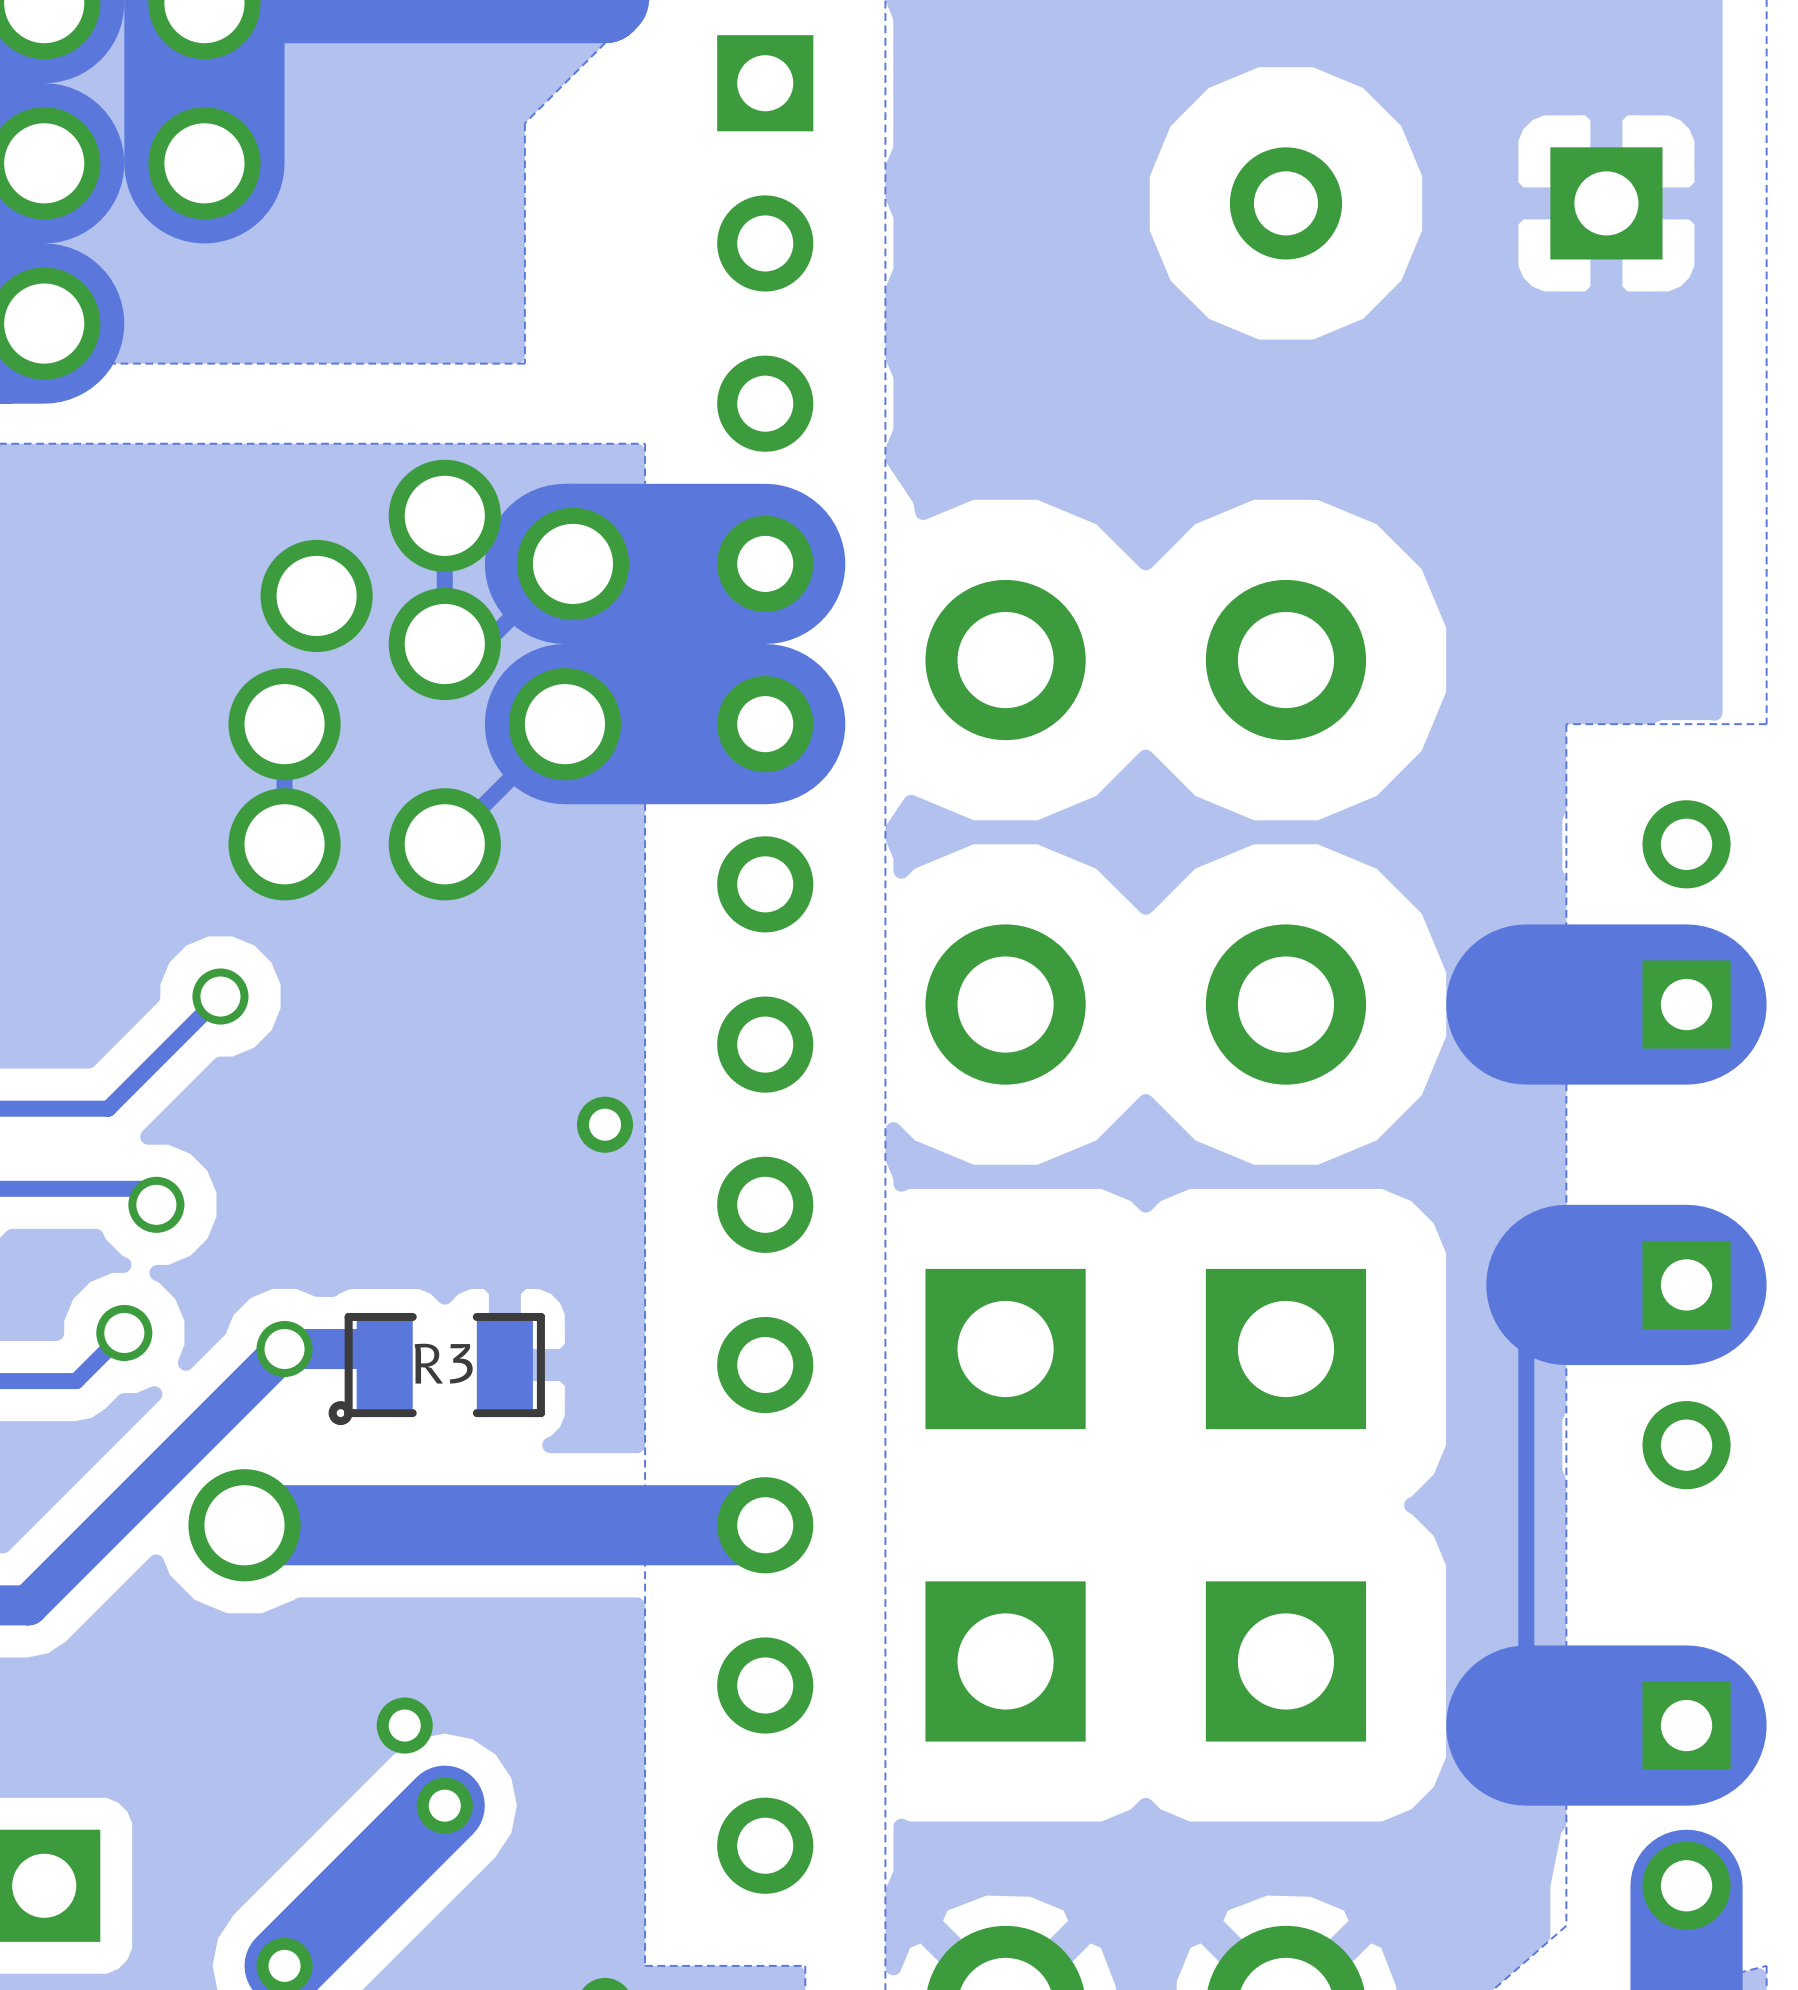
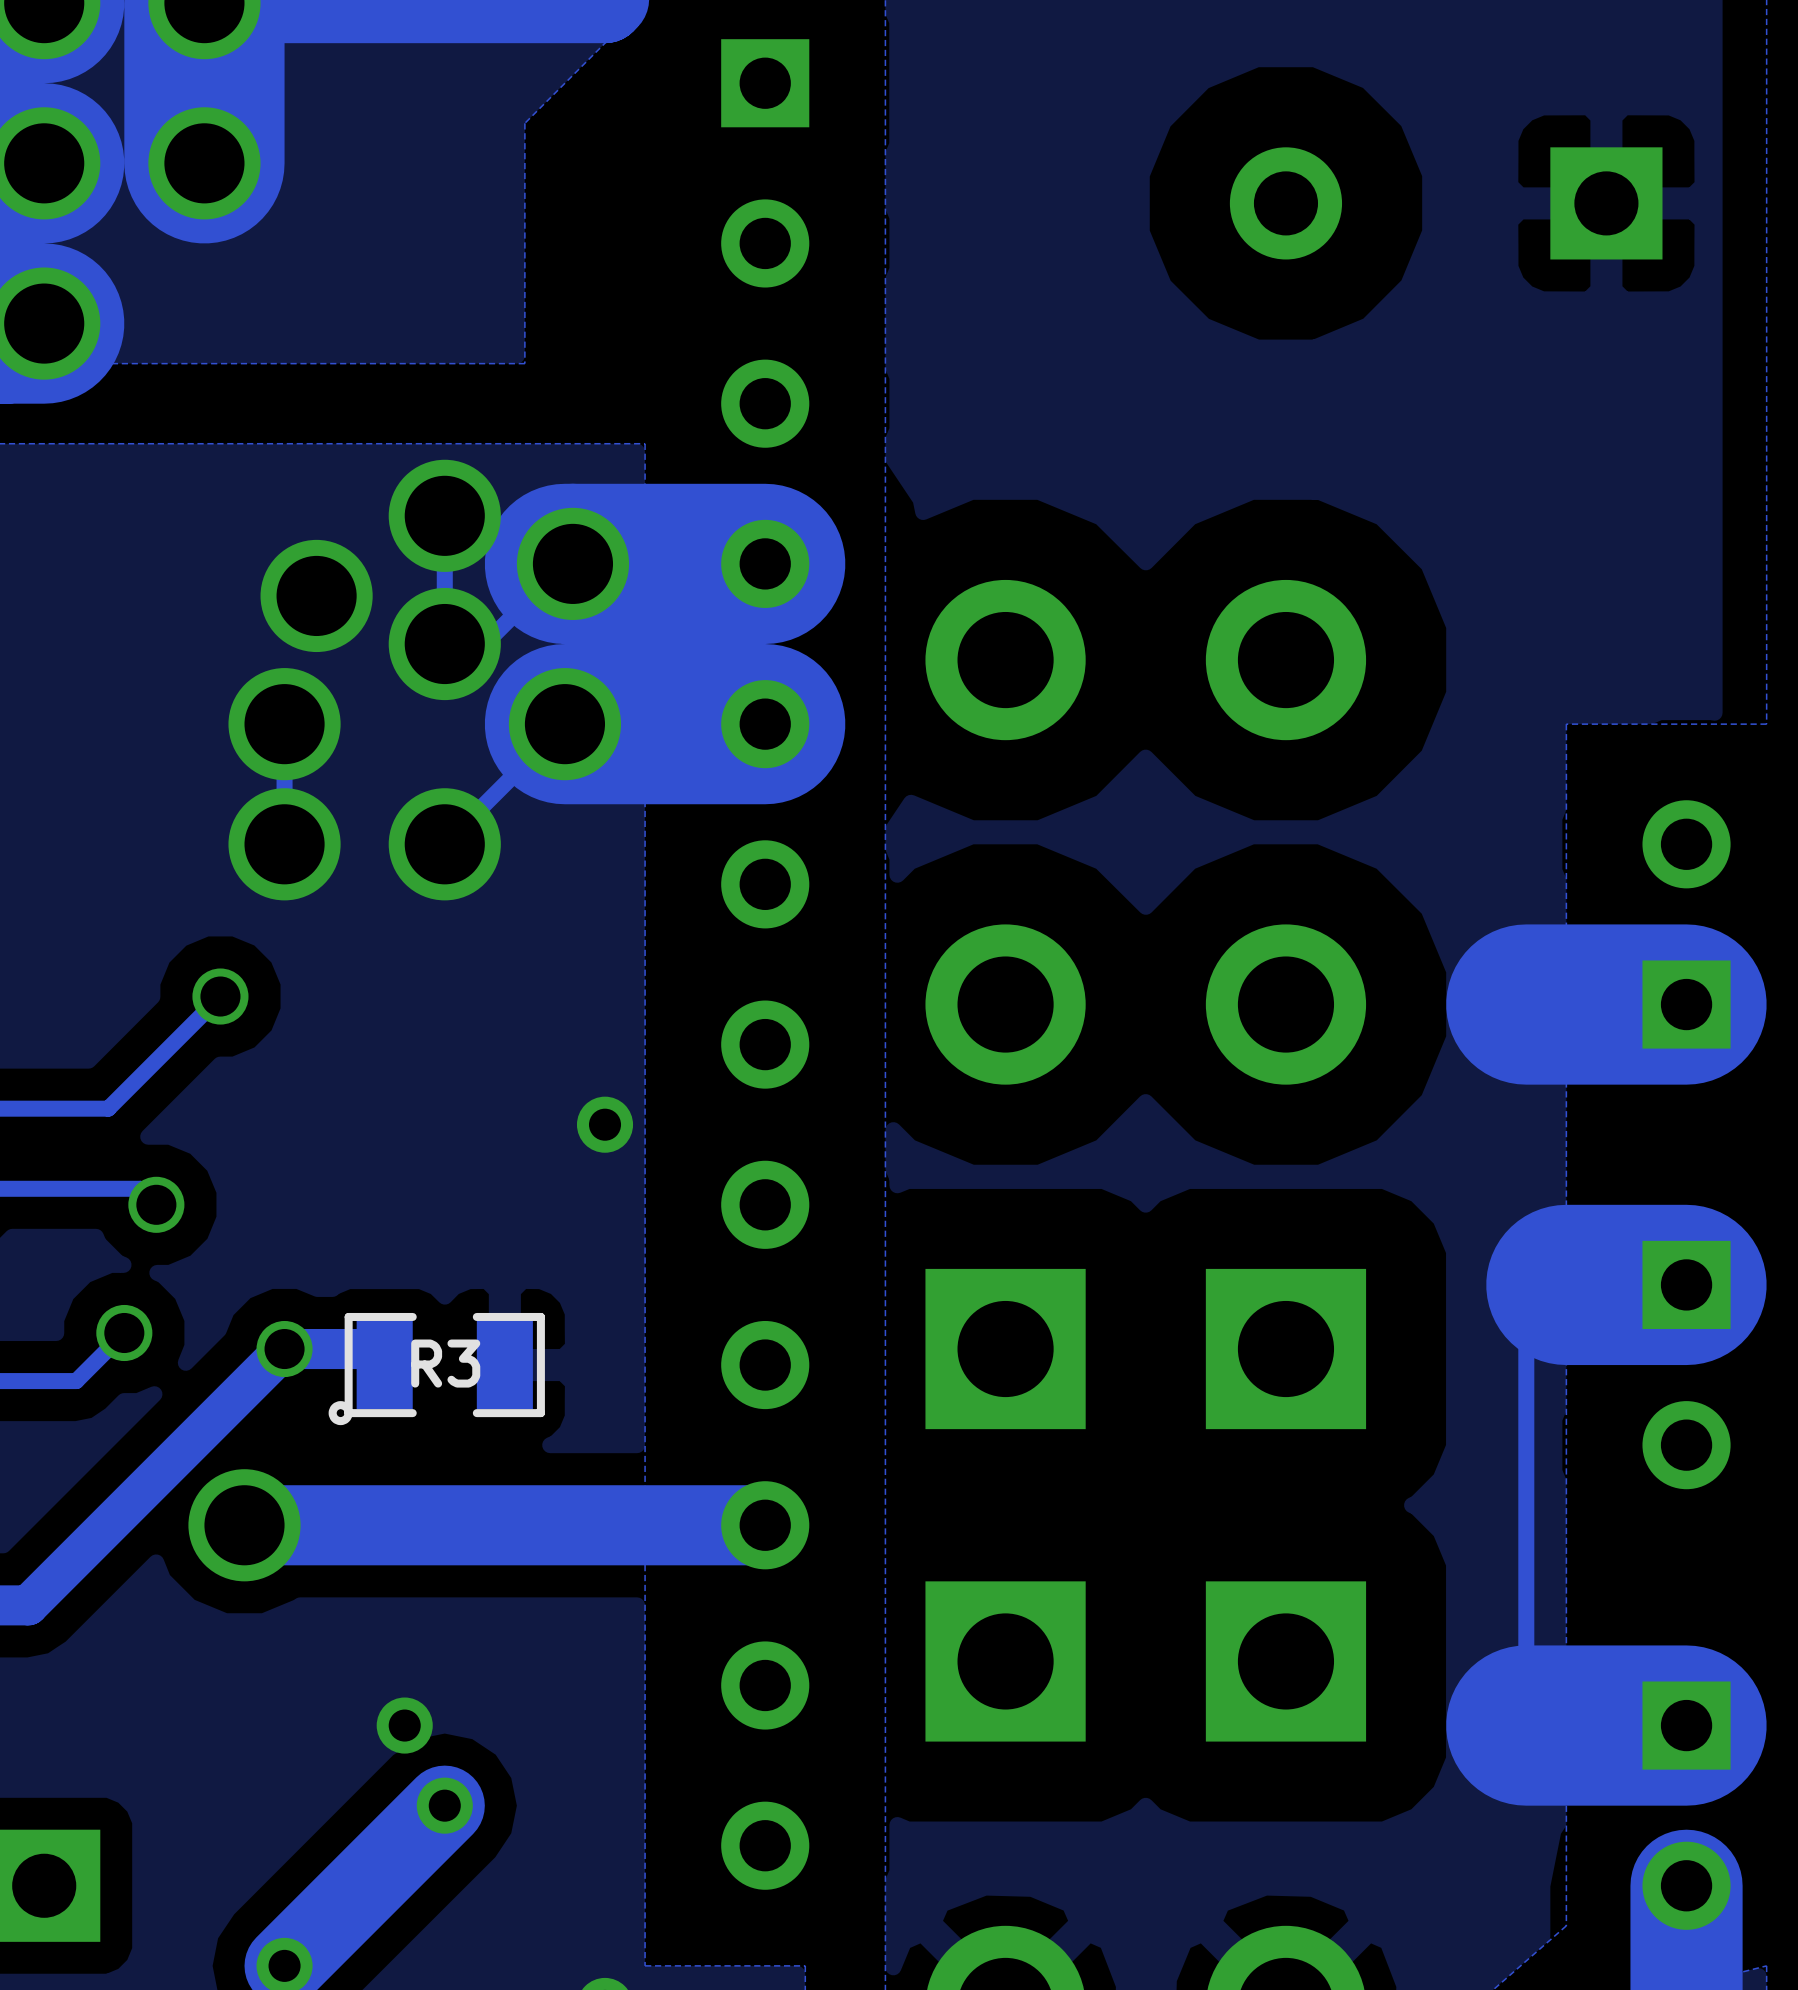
part footprint: [717, 35, 814, 1894] -> [721, 39, 810, 1890]

